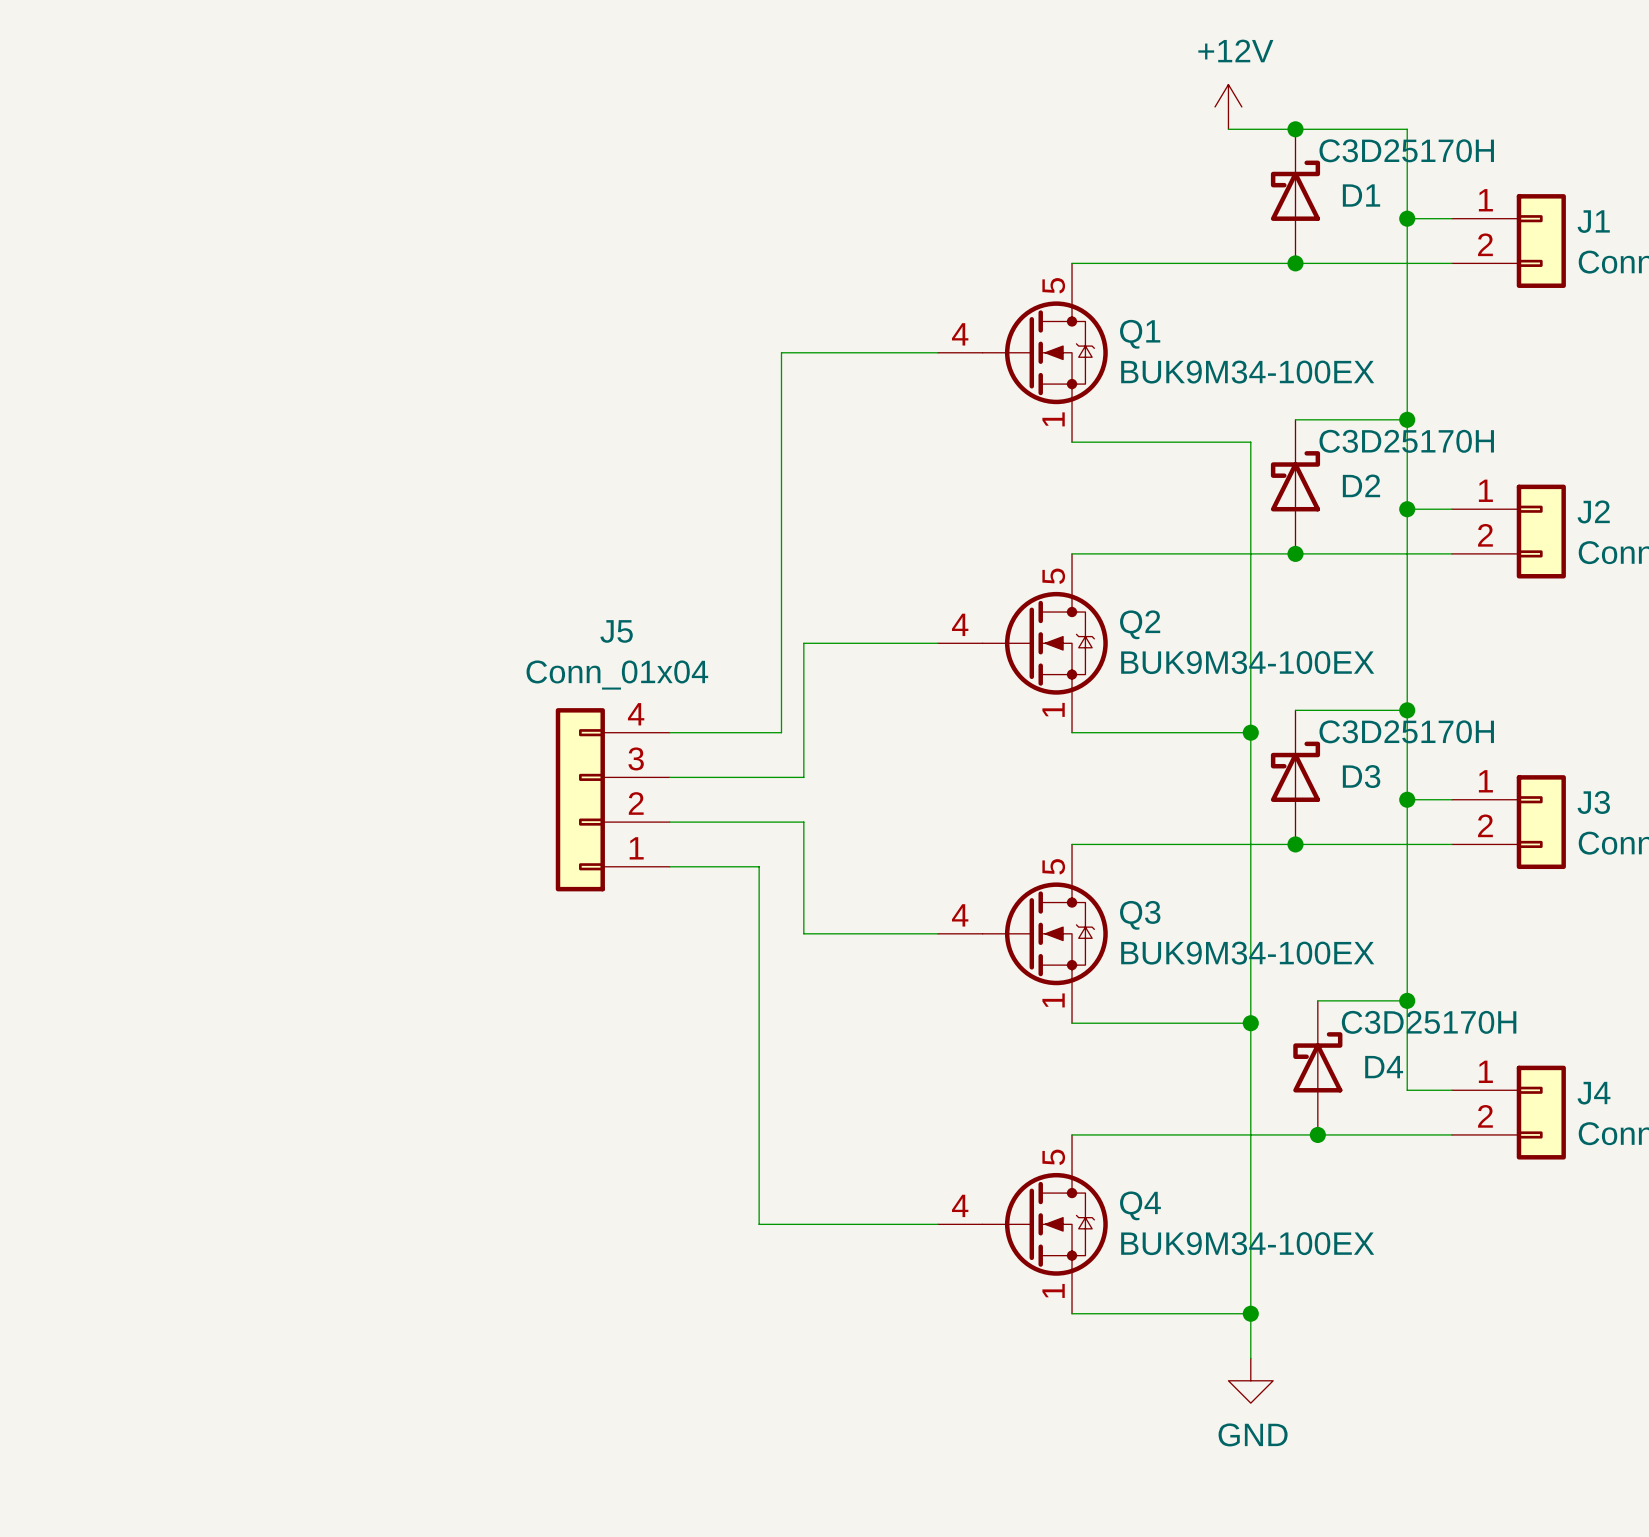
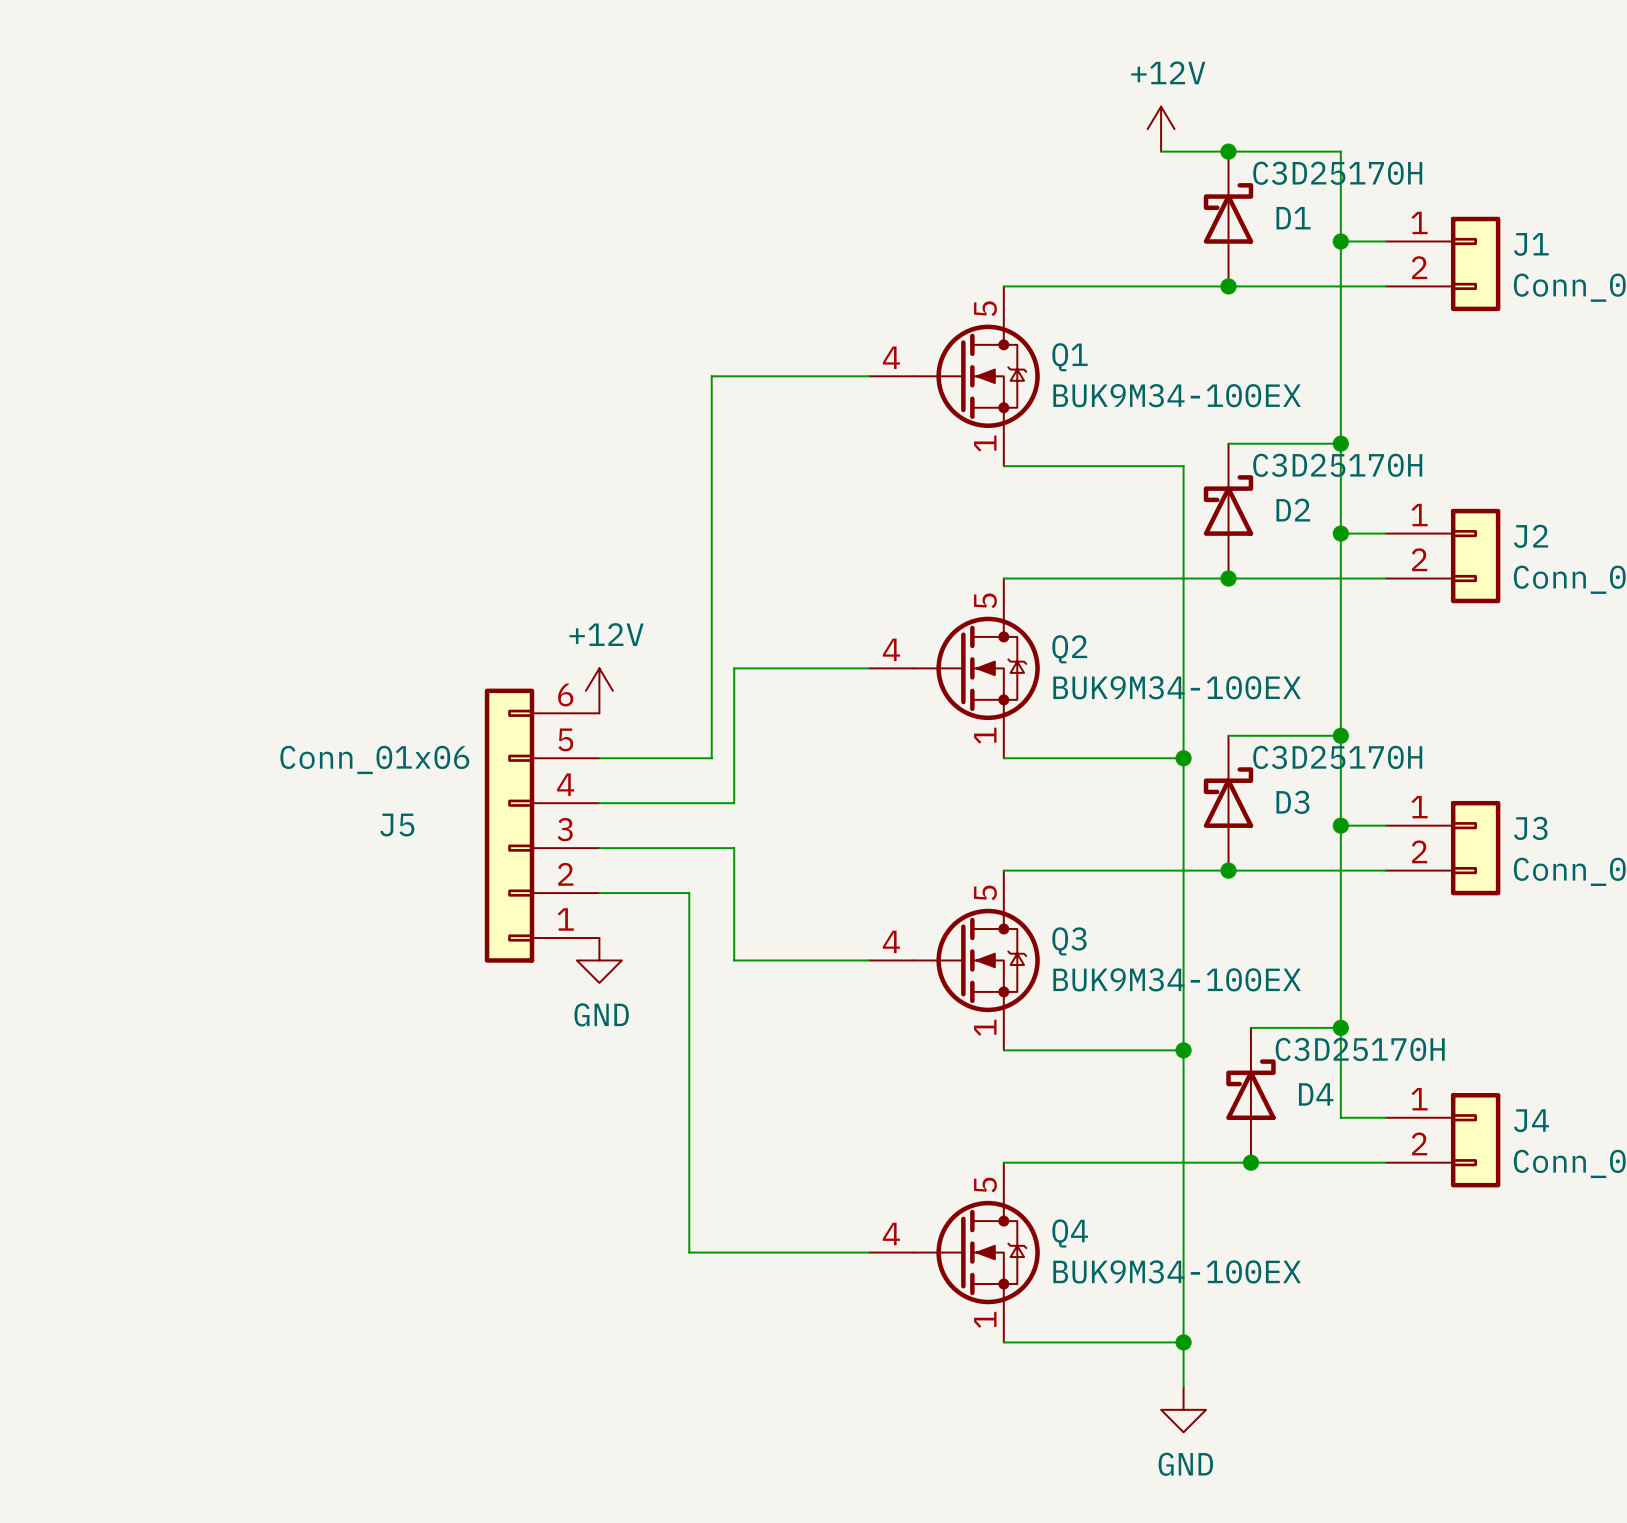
J5 name position: J5 (616, 631) -> J5 (397, 825)
power symbol: none -> +12V (599, 690)
J5 value: Conn_01x04 (617, 675) -> Conn_01x06 (374, 759)
J5 symbol: [555, 708, 670, 892] -> [484, 688, 600, 963]
power symbol: none -> GND (599, 960)

